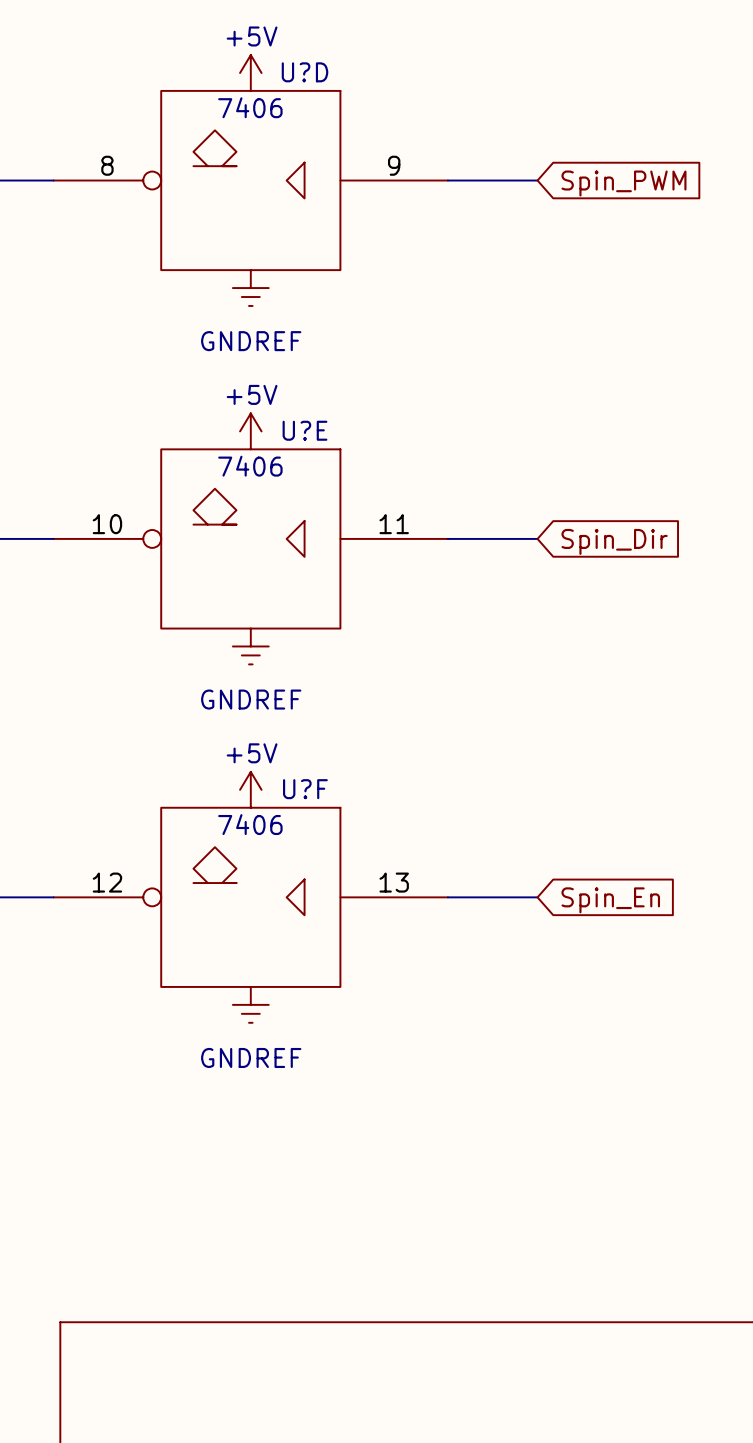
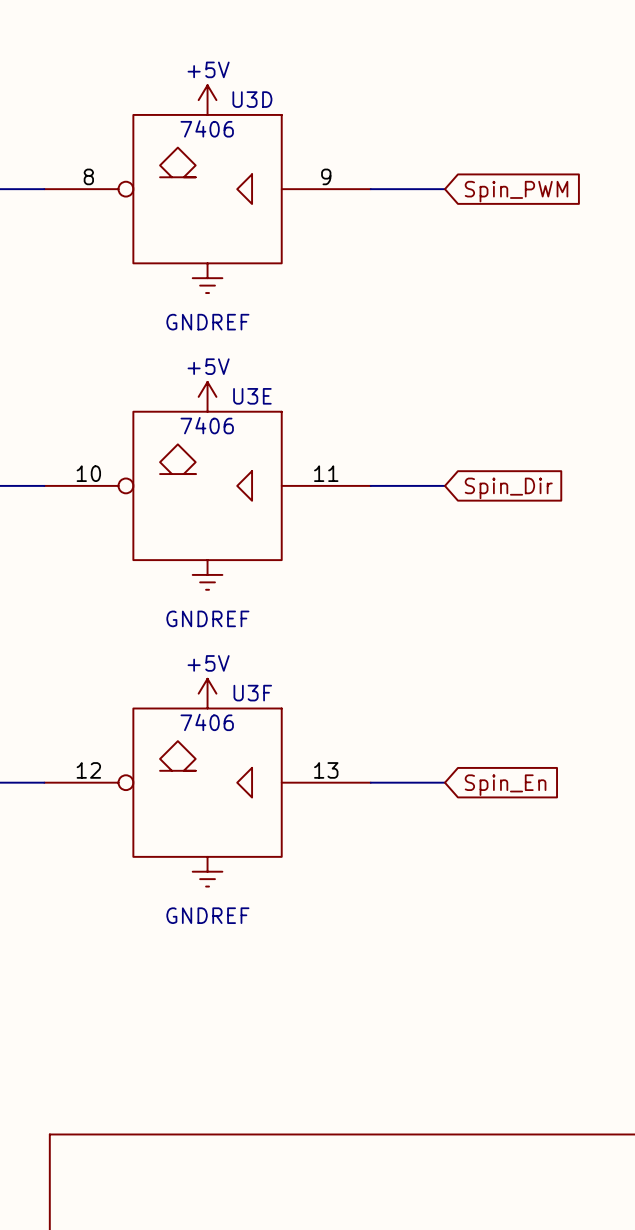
U?D name: U?D (305, 72) -> U3D (252, 99)
U?E name: U?E (305, 430) -> U3E (252, 396)
U?F name: U?F (305, 789) -> U3F (252, 693)

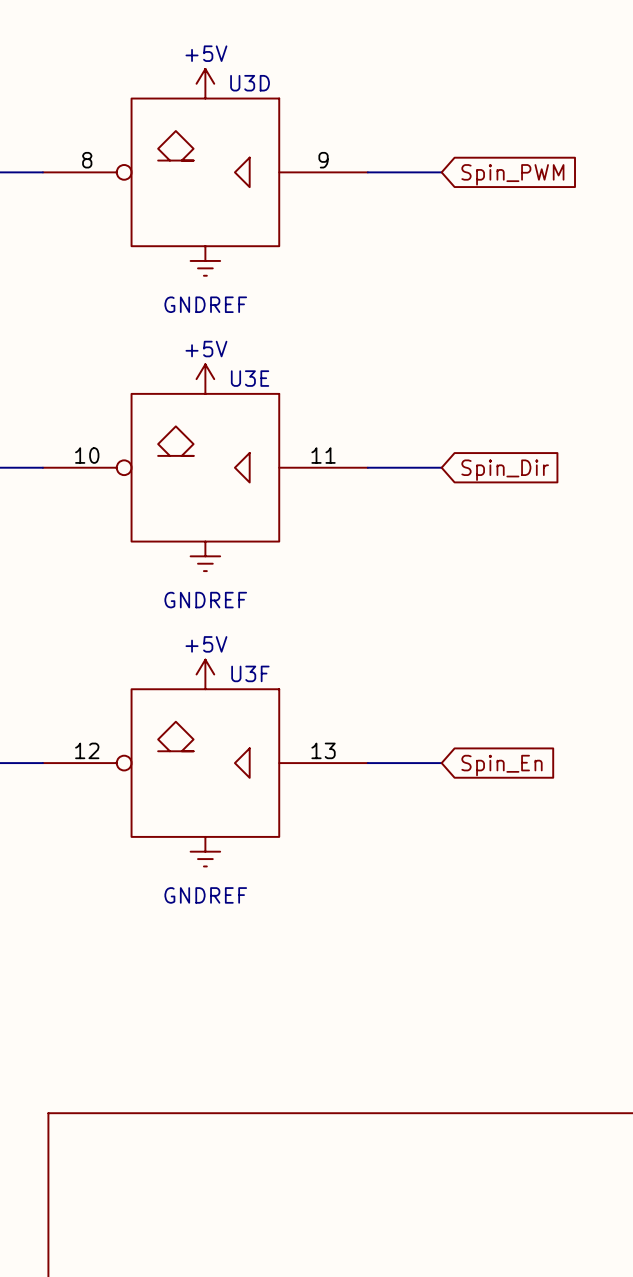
U3D value: 7406 (207, 128) -> none
U3E value: 7406 (207, 425) -> none
U3F value: 7406 (207, 722) -> none

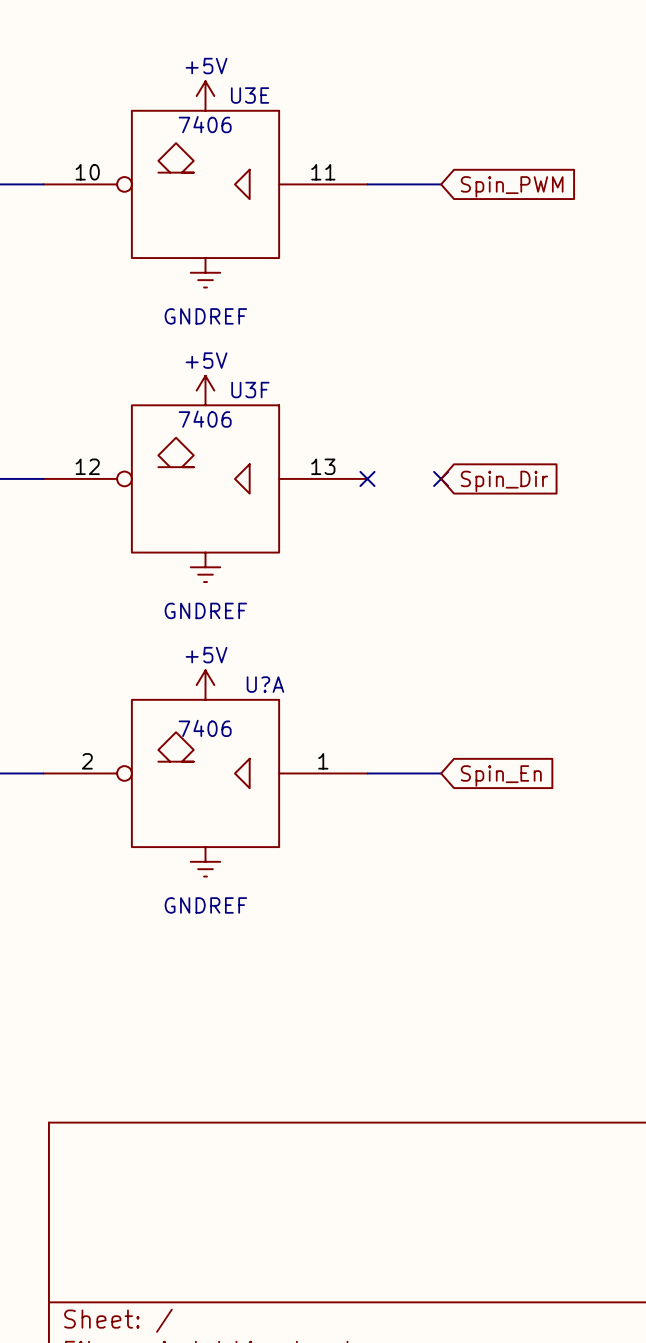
U3E value: none -> 7406 (205, 124)
U3D: (205, 172) -> none
U3F value: none -> 7406 (205, 419)
U3E position: (205, 467) -> (205, 184)
wire: (367, 467) (441, 467) -> none
no-connect mark: none -> (367, 478)
no-connect mark: none -> (441, 478)
U3F position: (205, 763) -> (205, 478)
U?A: none -> 7406 (205, 773)

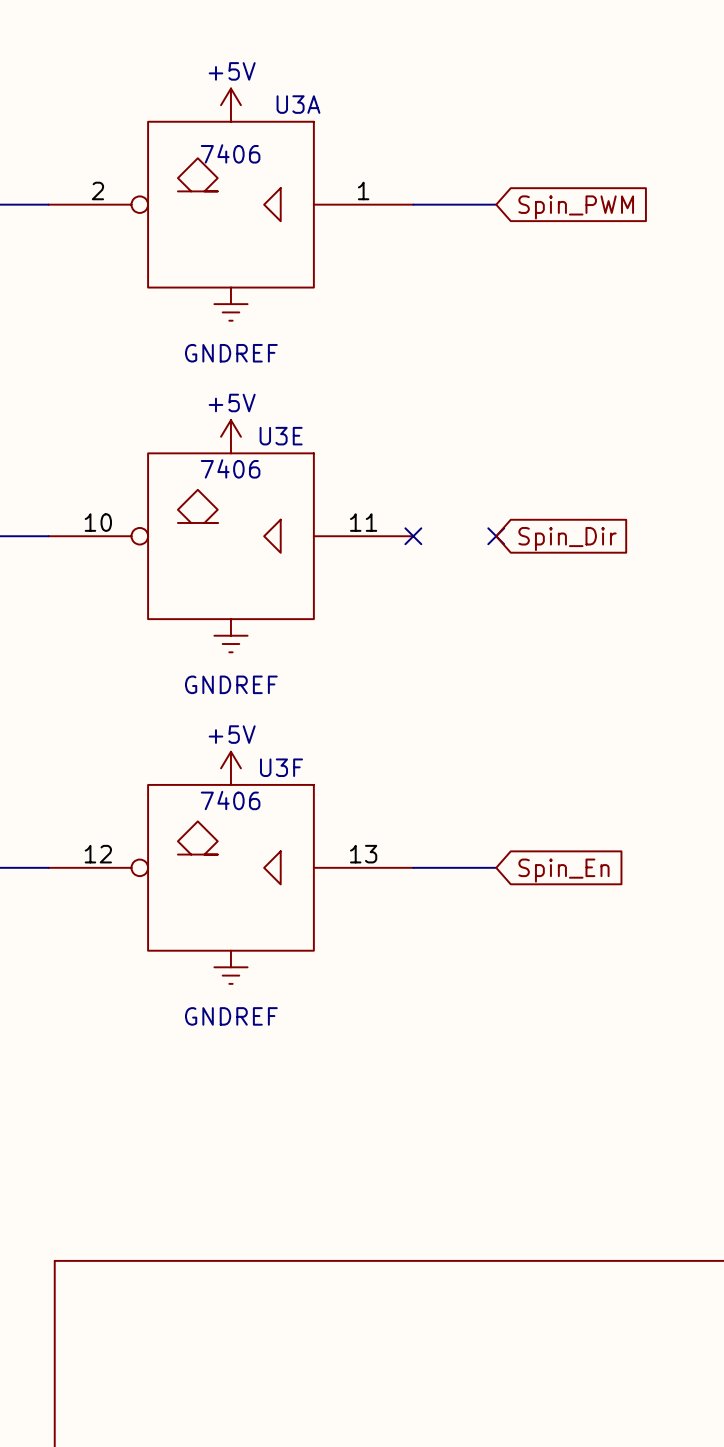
U3E position: (205, 184) -> (230, 536)
U3A: none -> 7406 (230, 204)
U3F position: (205, 478) -> (230, 867)
U?A: 7406 (205, 773) -> none

